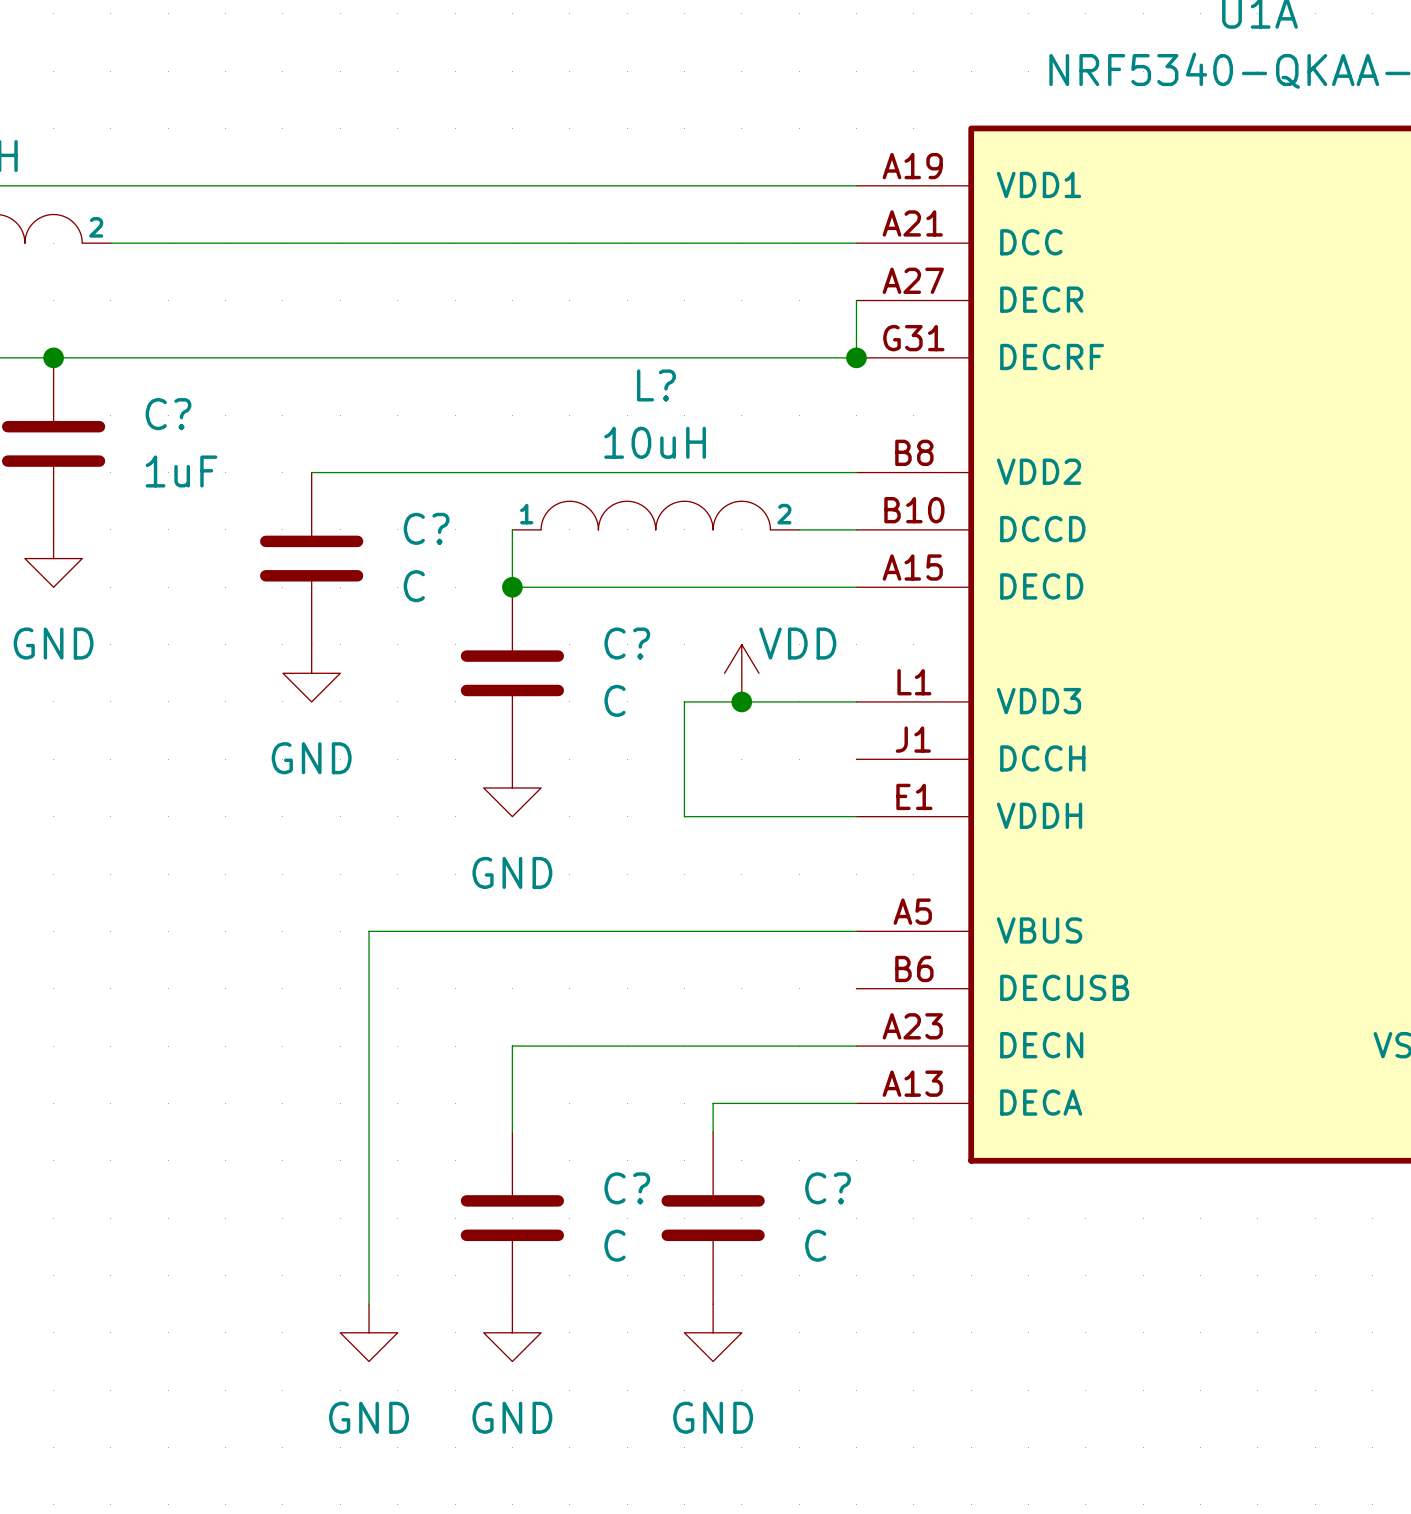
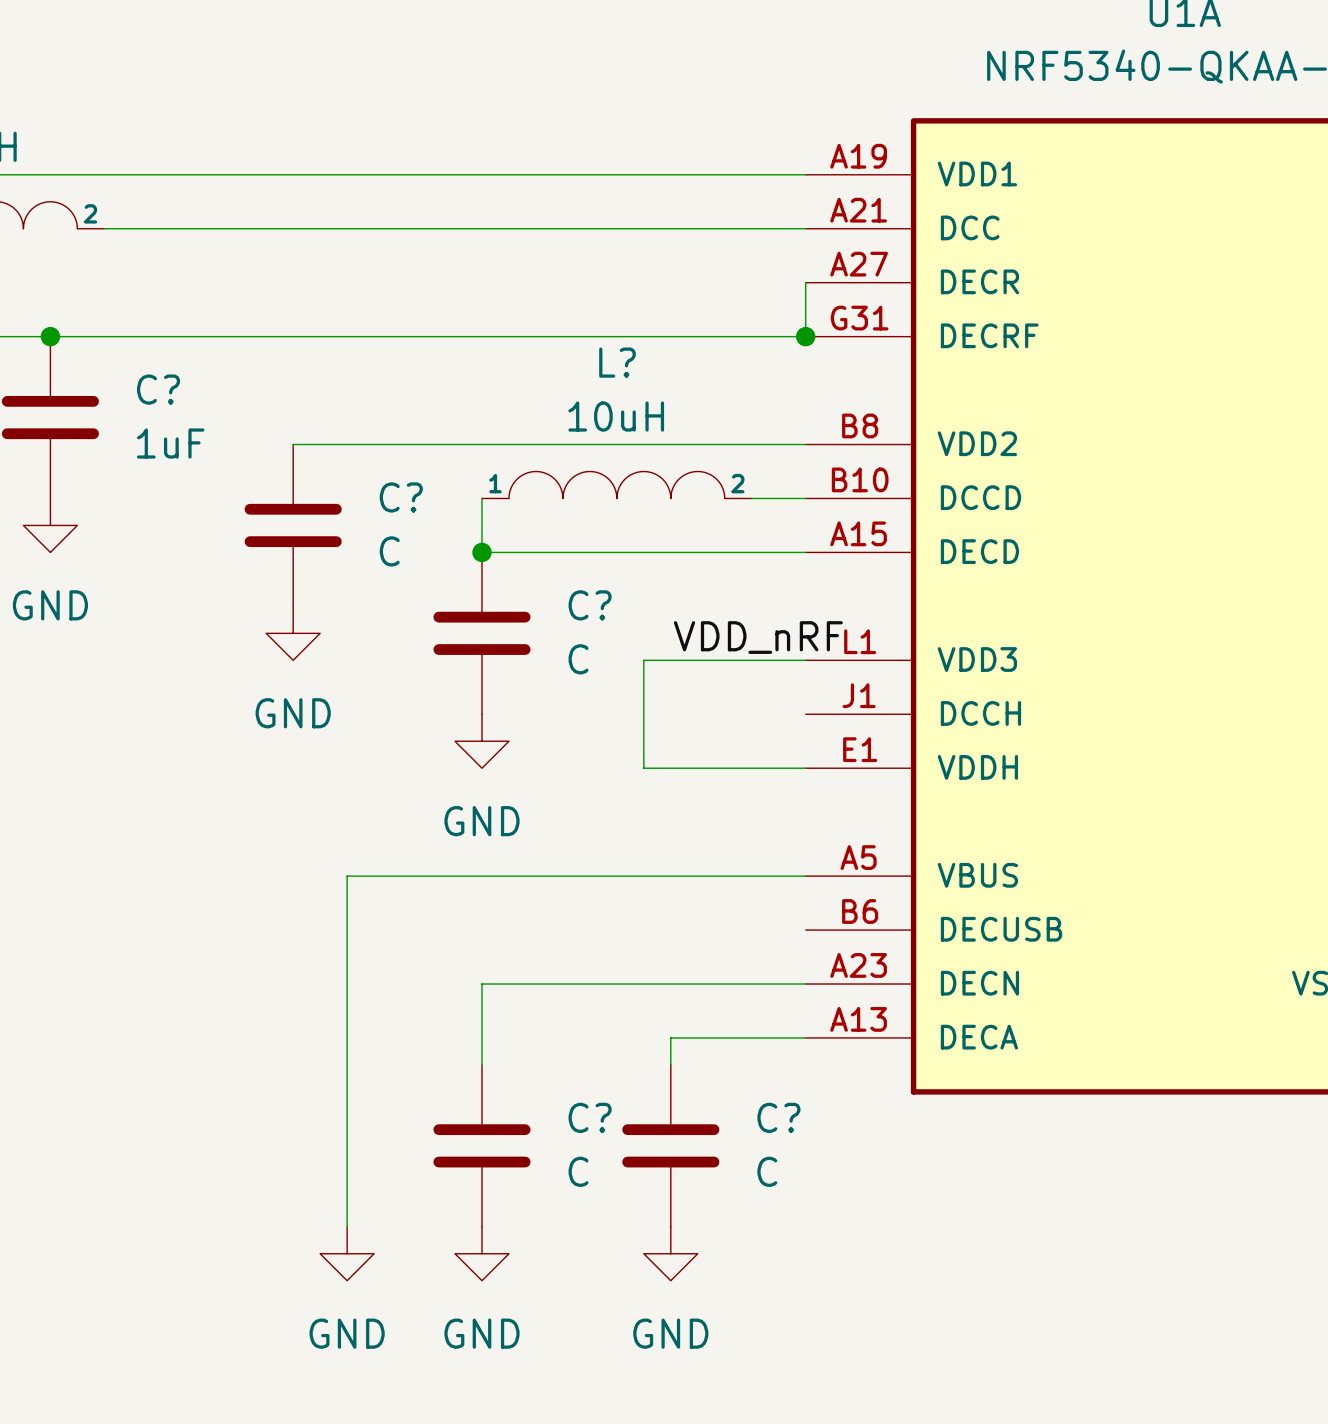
power symbol: VDD (741, 673) -> none
label: none -> VDD_nRF (758, 637)
junction: (741, 701) -> none

